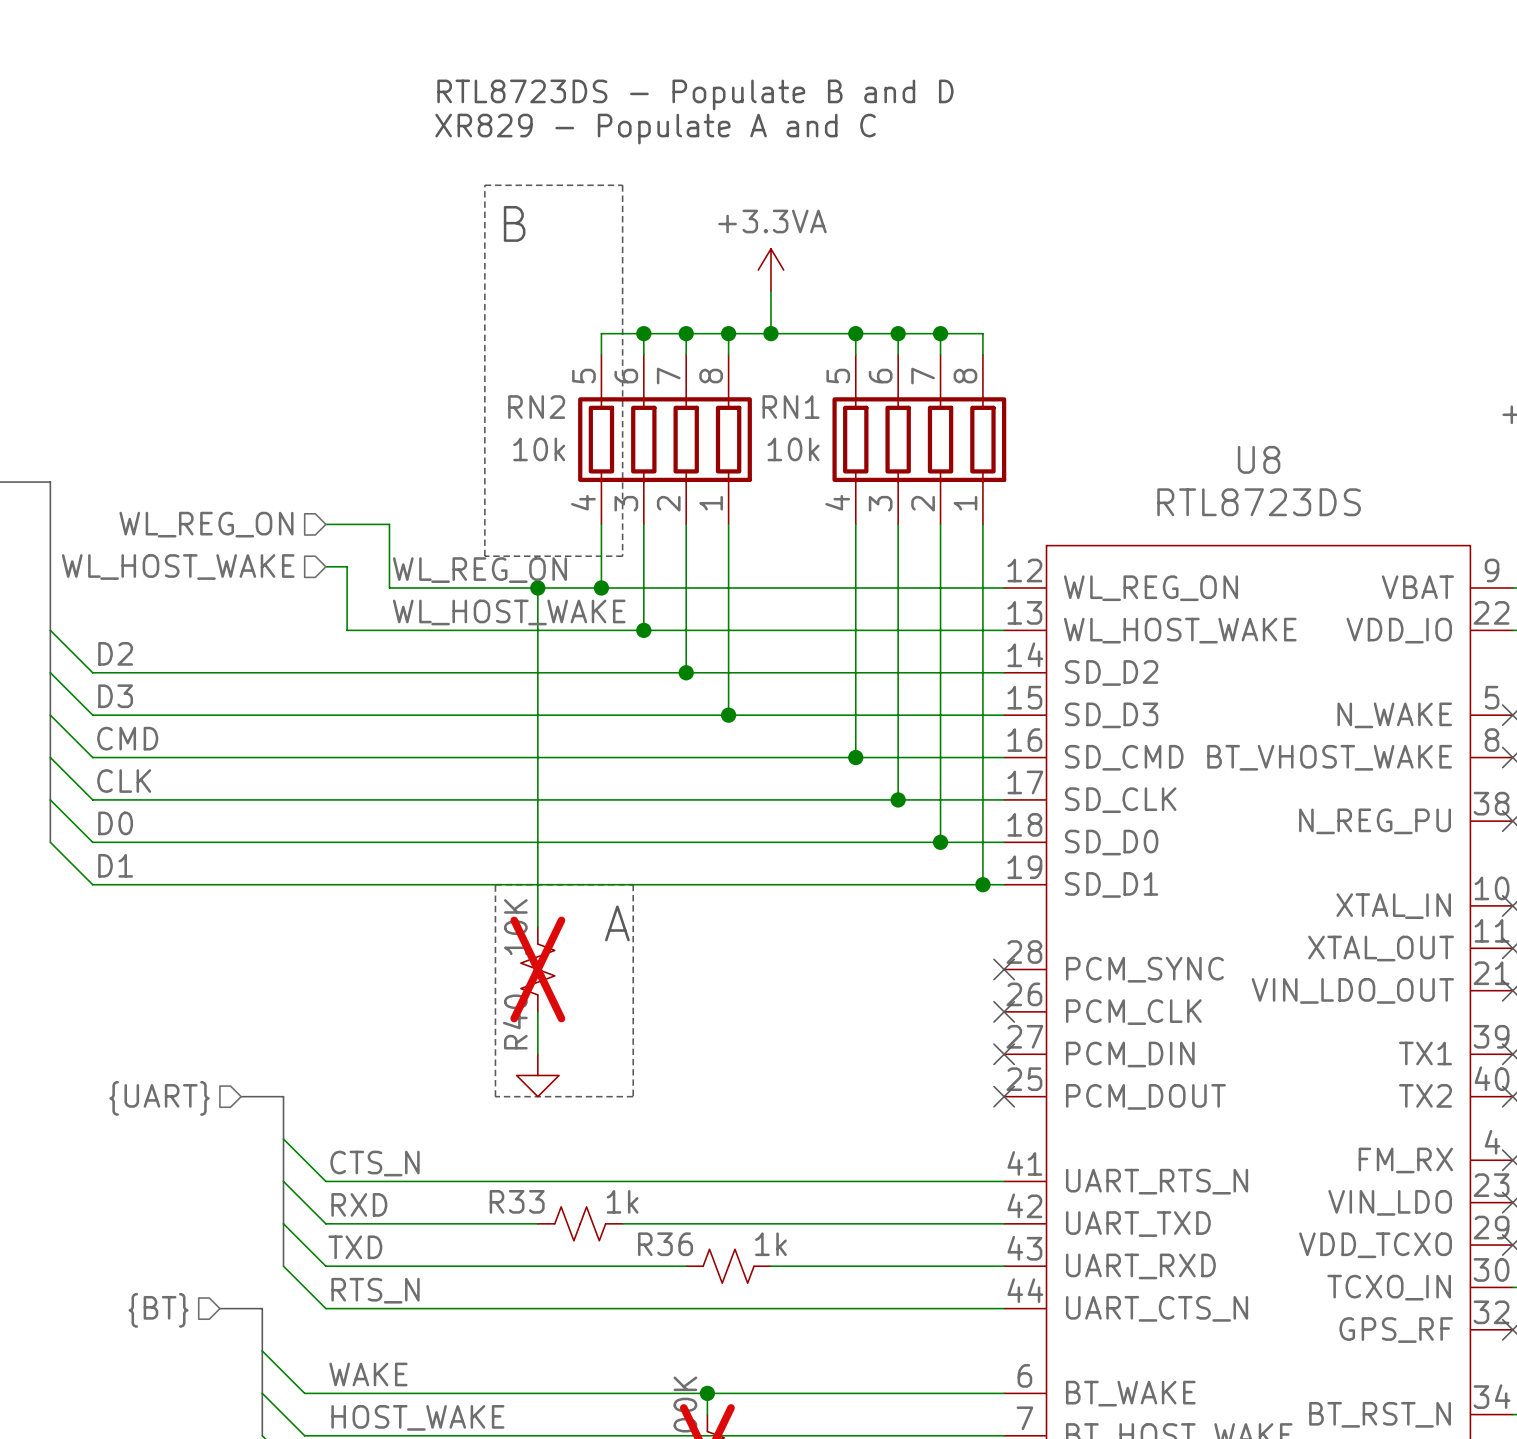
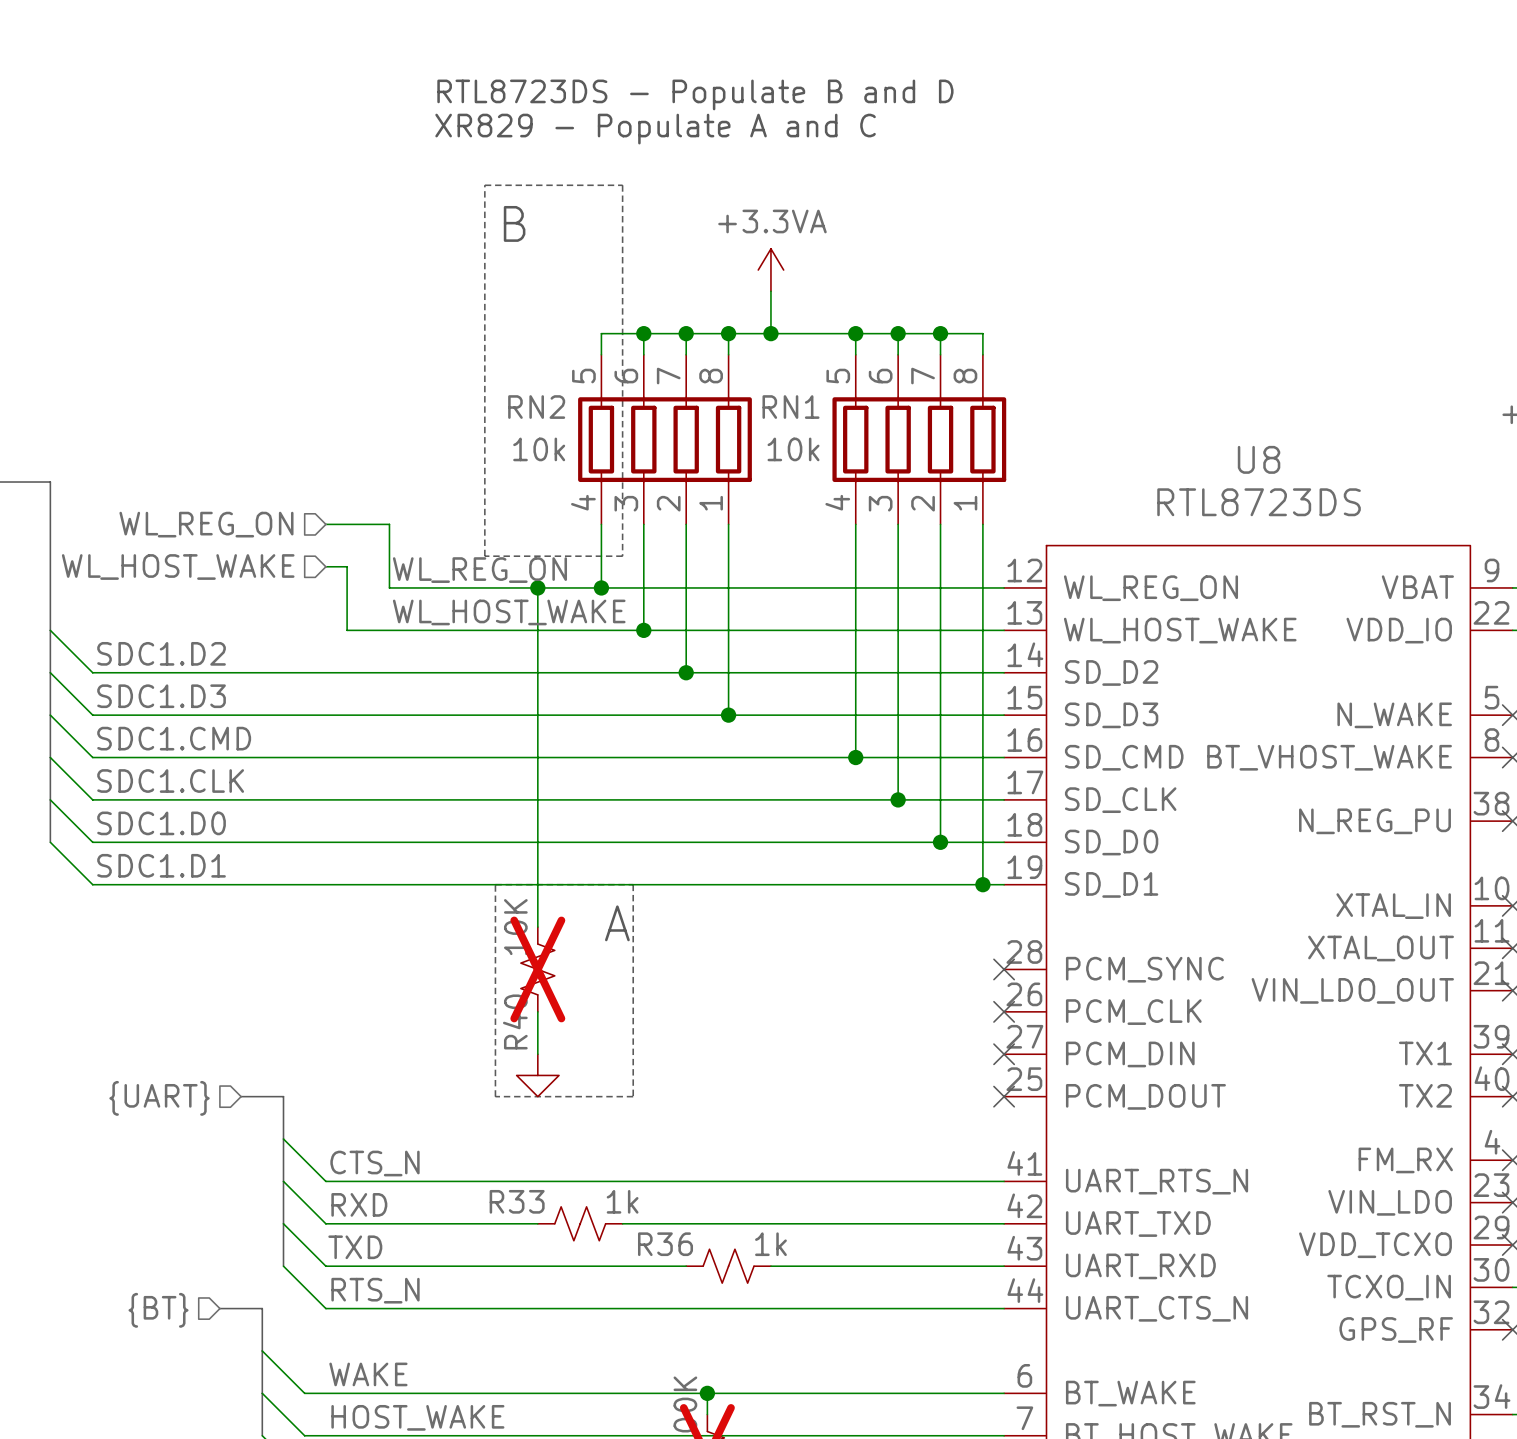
label: D2 (115, 653) -> SDC1.D2 (161, 653)
label: D3 (115, 696) -> SDC1.D3 (161, 696)
label: CMD (127, 738) -> SDC1.CMD (174, 738)
label: CLK (124, 781) -> SDC1.CLK (170, 781)
label: D0 (115, 823) -> SDC1.D0 (161, 823)
label: D1 (115, 865) -> SDC1.D1 (161, 865)

